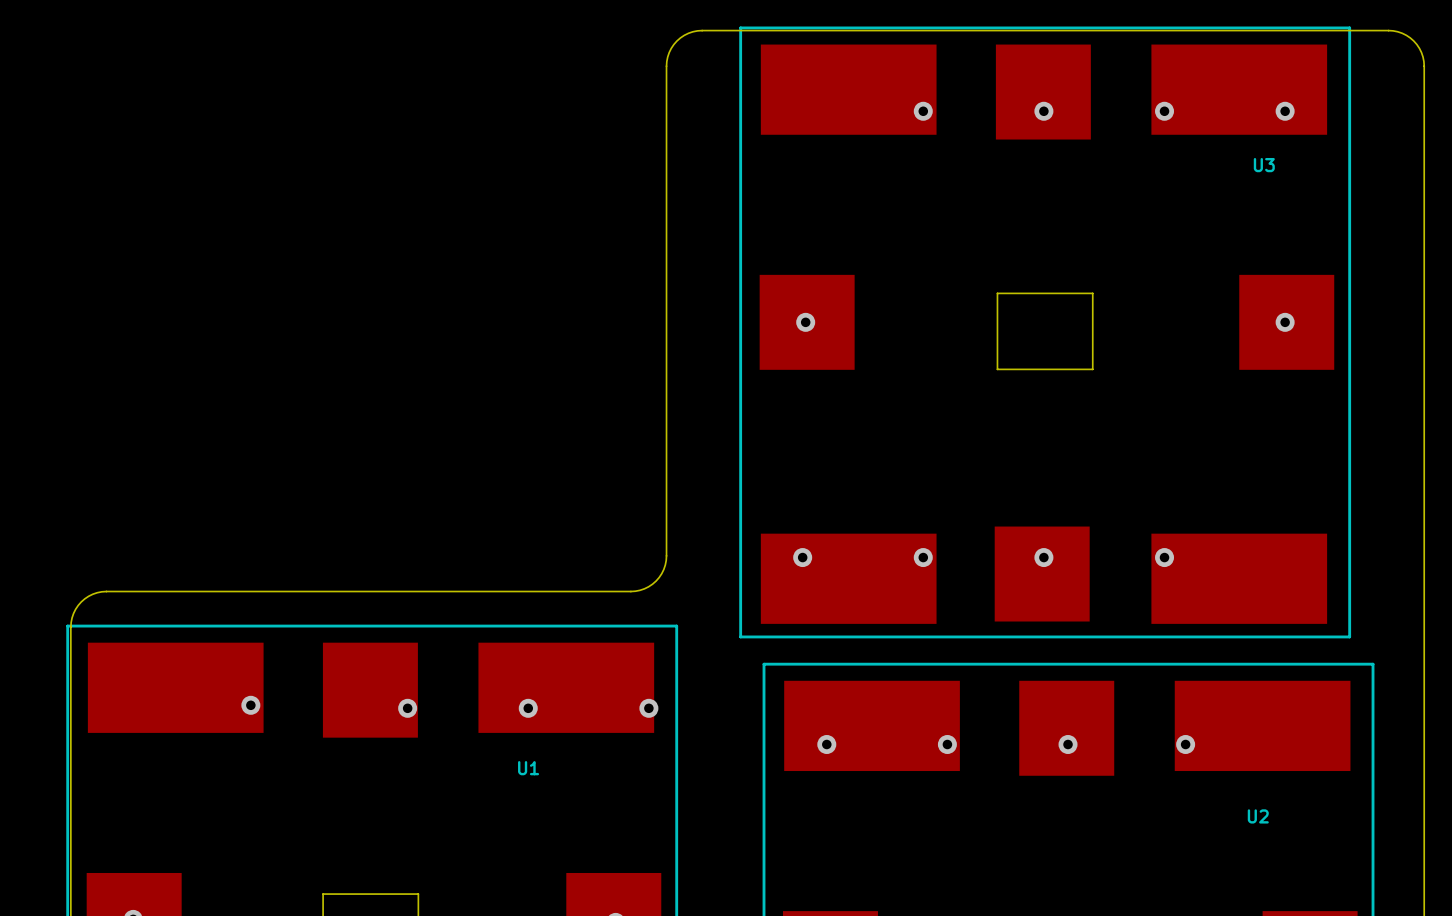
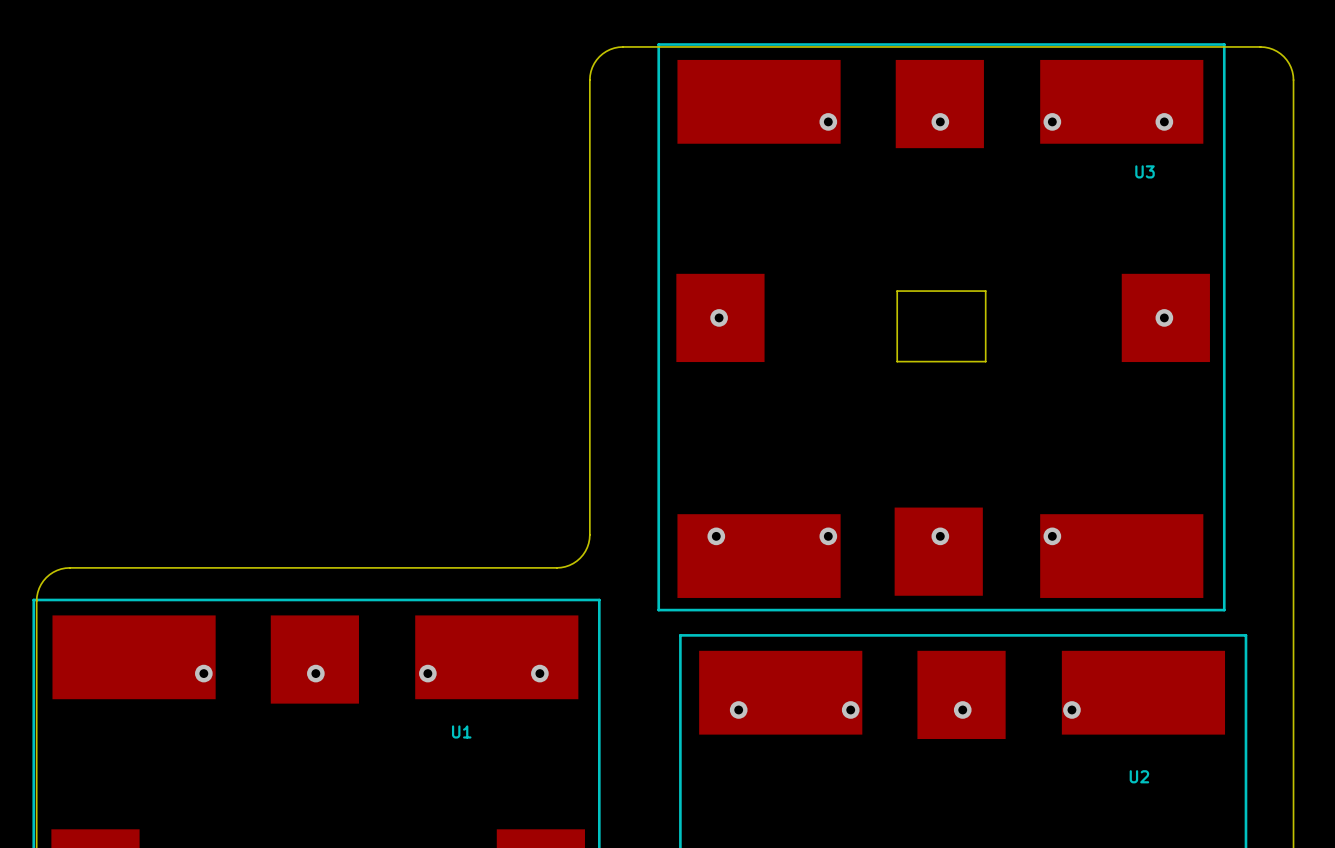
via position: (407, 708) -> (315, 673)
via position: (528, 708) -> (427, 673)
via position: (648, 708) -> (539, 673)

